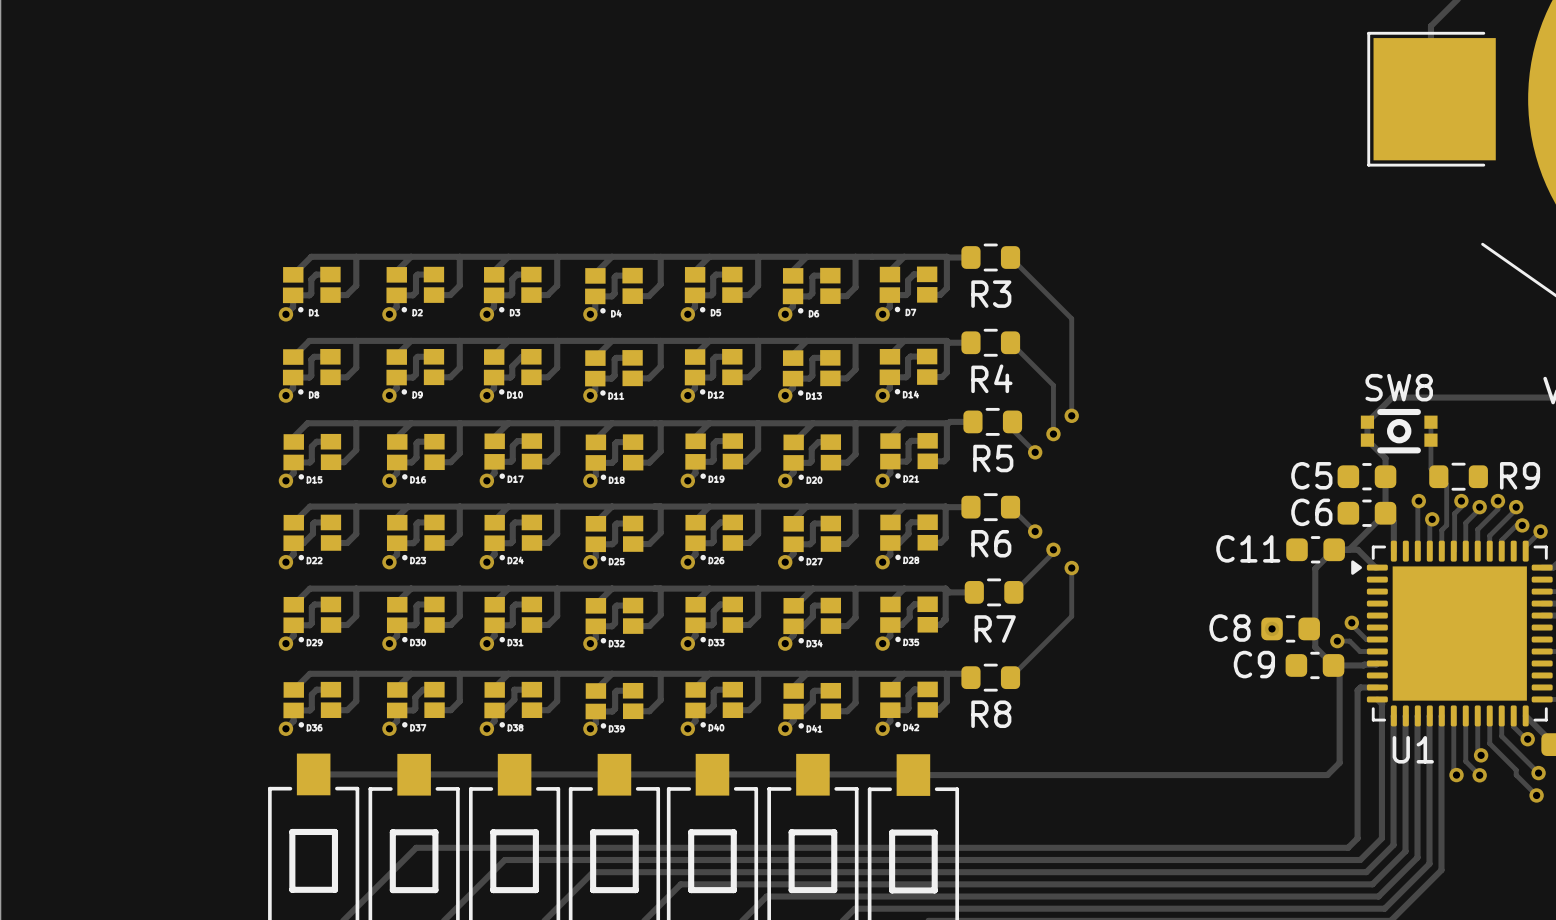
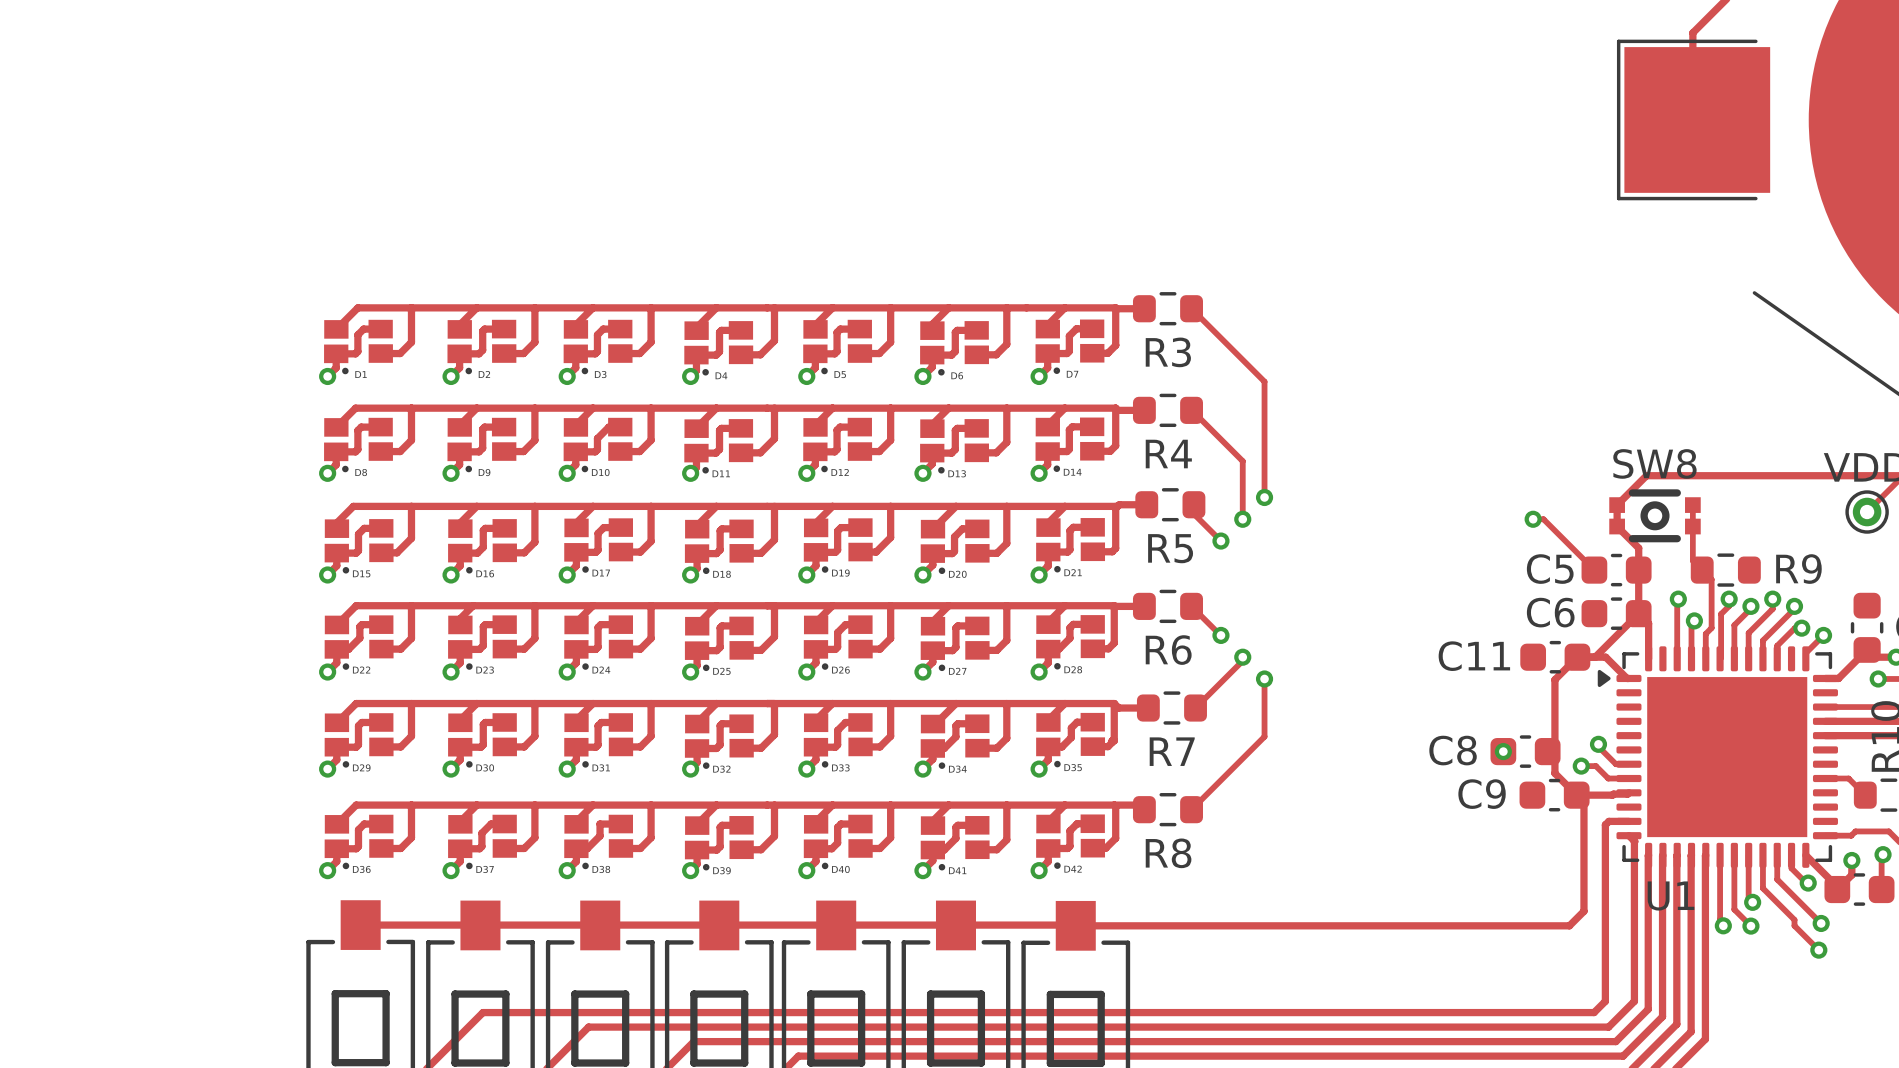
track: none -> (1533, 519) (1543, 519) (1594, 570)
via: none -> (1533, 519)

